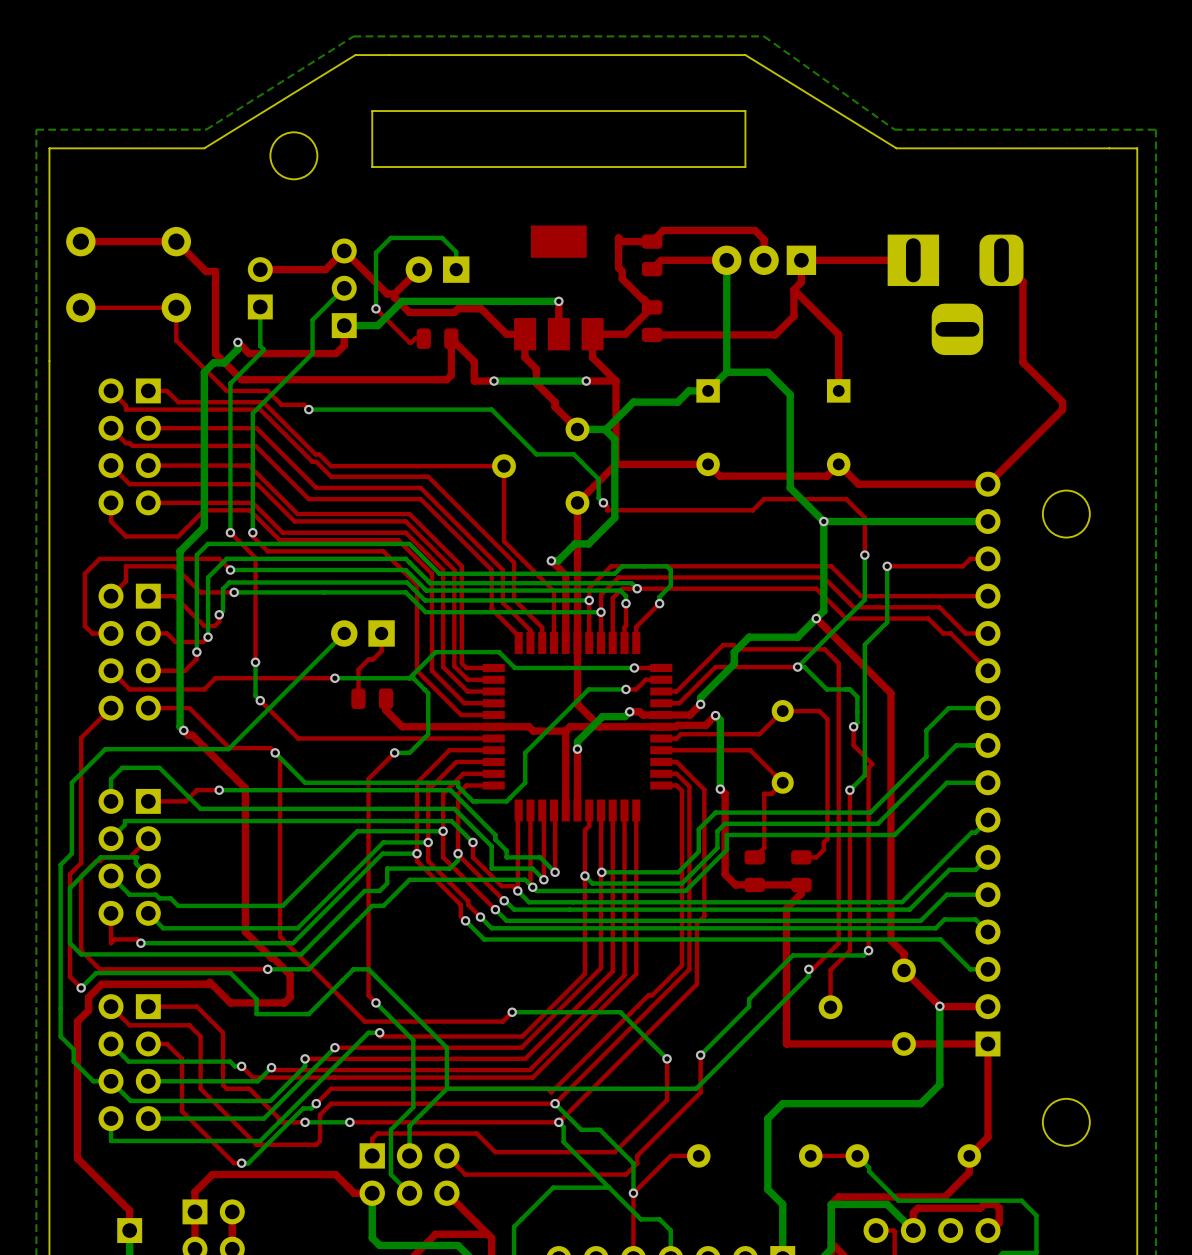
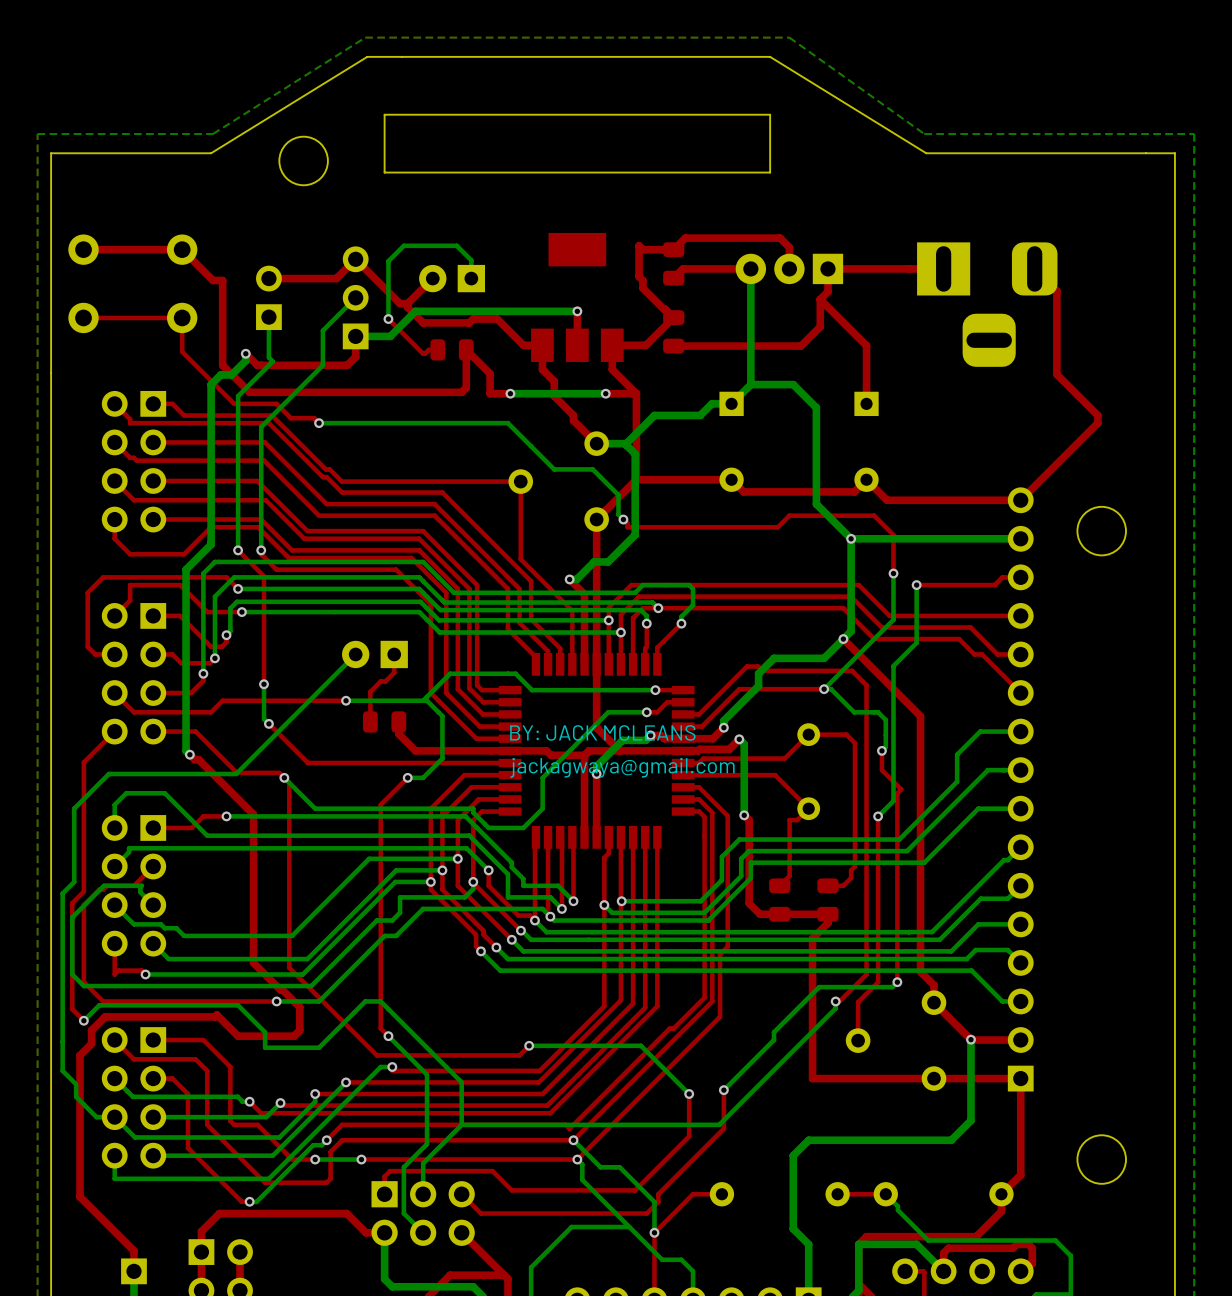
text: none -> BY: JACK MCLEANS (602, 732)
text: none -> jackagwaya@gmail.com (622, 767)

